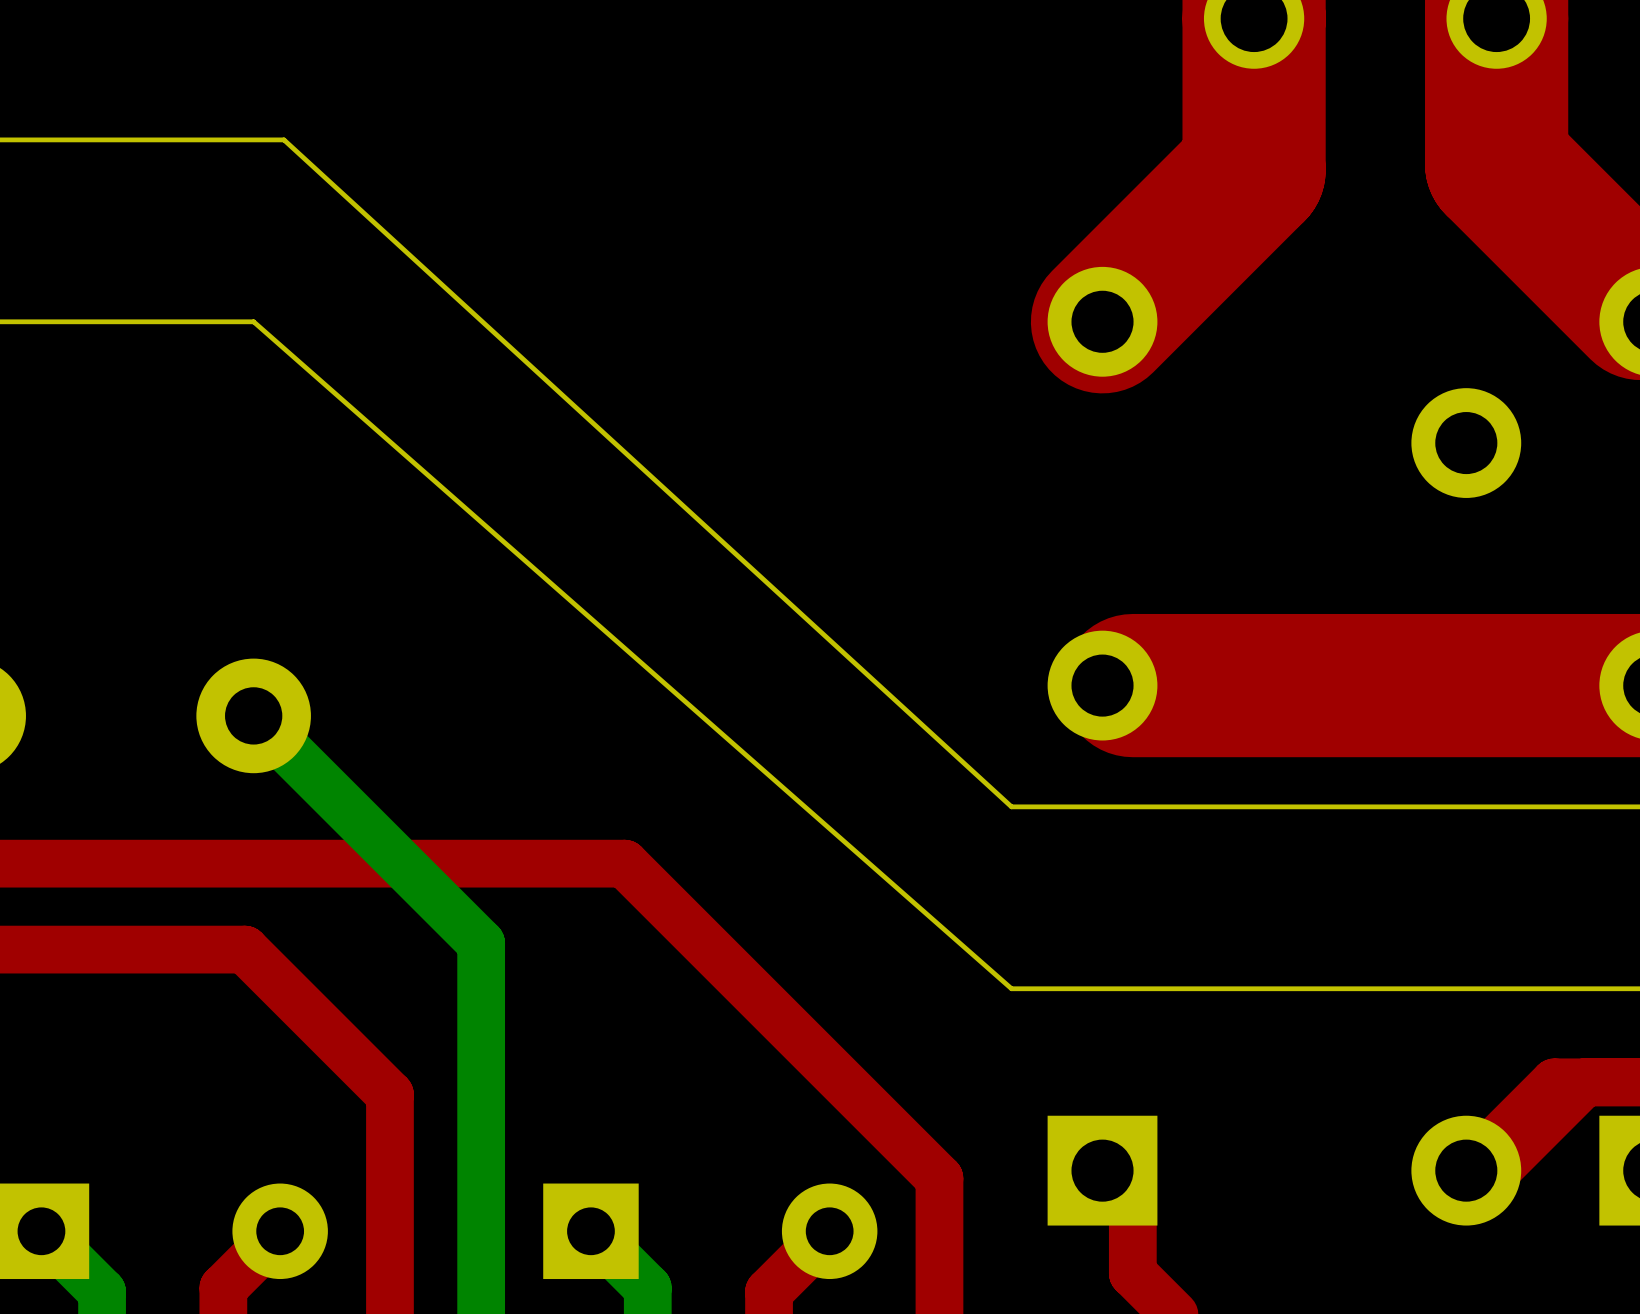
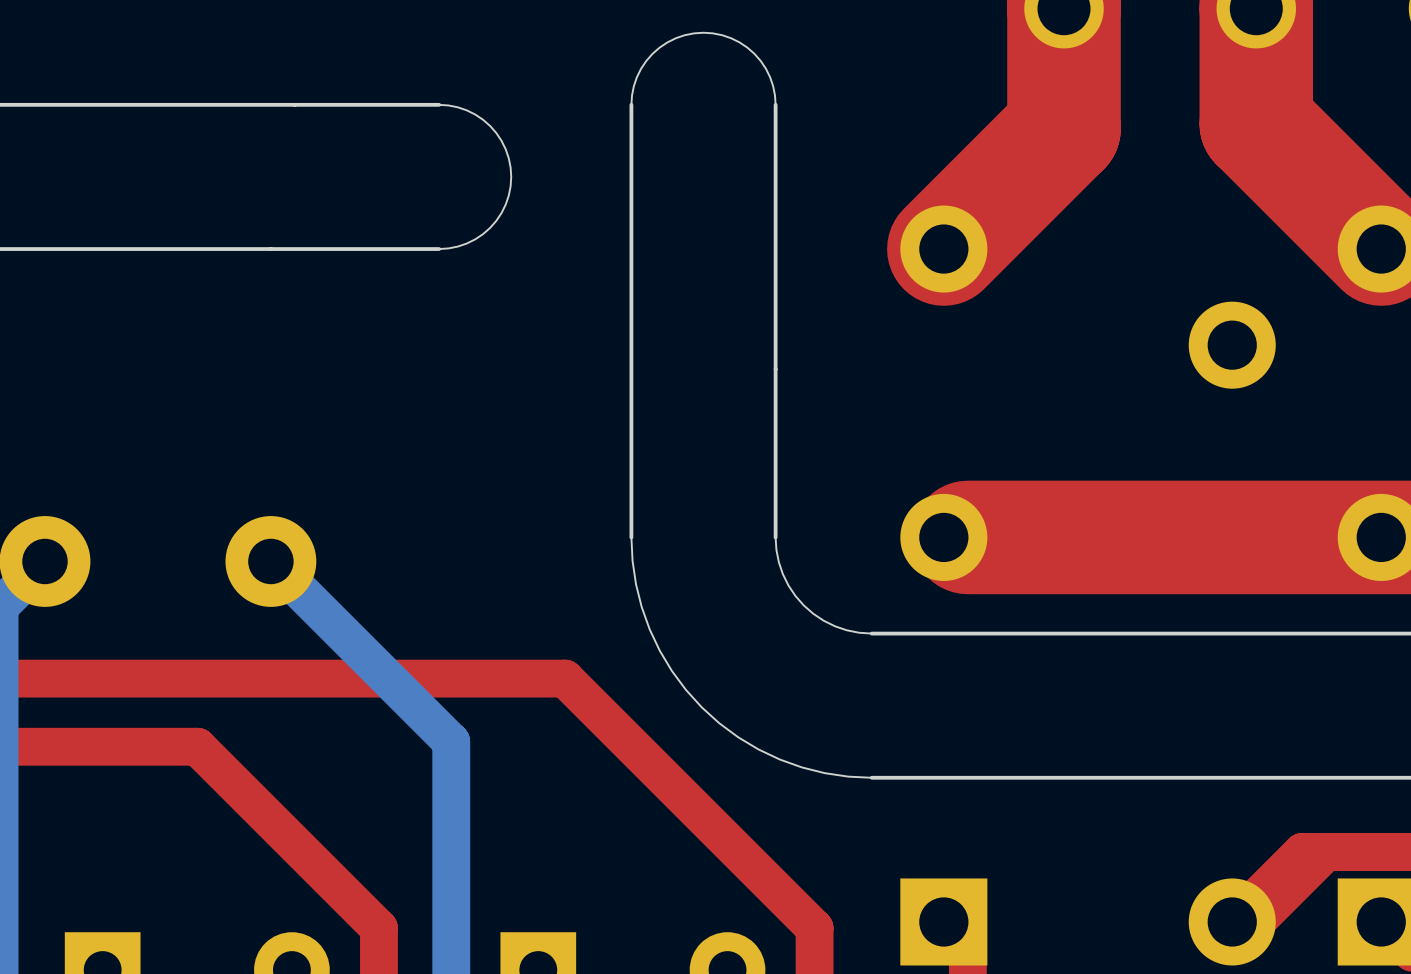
board edge: (283, 139) (1011, 806) -> (294, 104) (439, 104) (466, 110) (483, 119) (501, 140) (510, 167) (510, 186) (505, 204) (490, 227) (475, 239) (457, 246) (439, 249) (270, 249)
board edge: (253, 321) (1011, 988) -> (871, 633) (859, 632) (834, 626) (813, 613) (803, 605) (788, 585) (782, 574) (776, 549) (775, 104) (773, 86) (760, 60) (739, 42) (712, 33) (684, 35) (667, 42) (652, 53) (641, 68) (632, 95) (631, 537) (632, 561) (641, 607) (649, 629) (671, 670) (685, 689) (719, 723) (738, 737) (779, 759) (824, 773) (871, 777)
top track: (160, 949) (244, 949) (389, 1094) (389, 1178) -> (197, 746) (378, 928)

